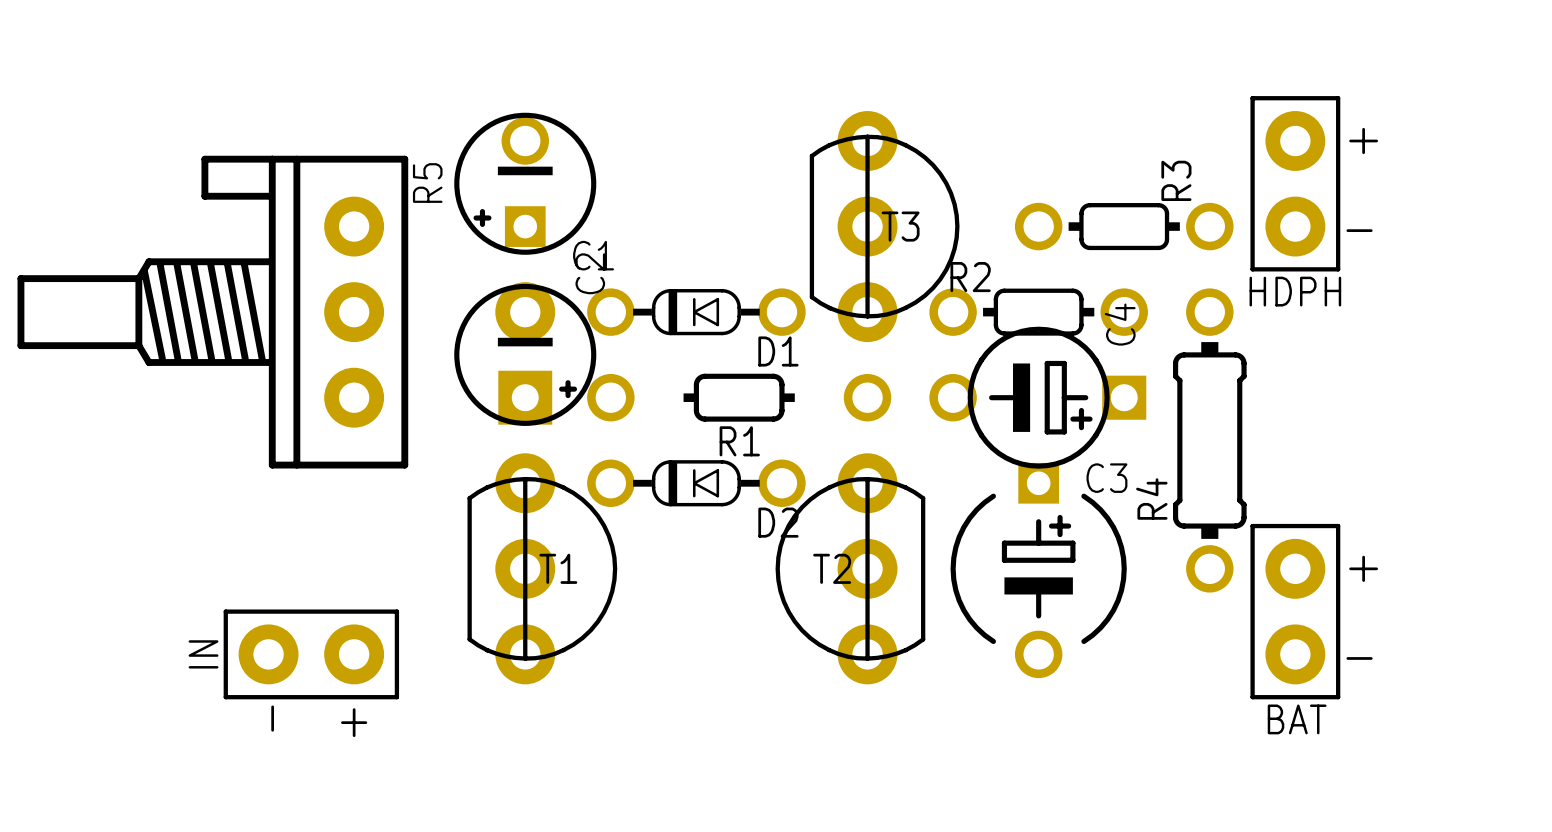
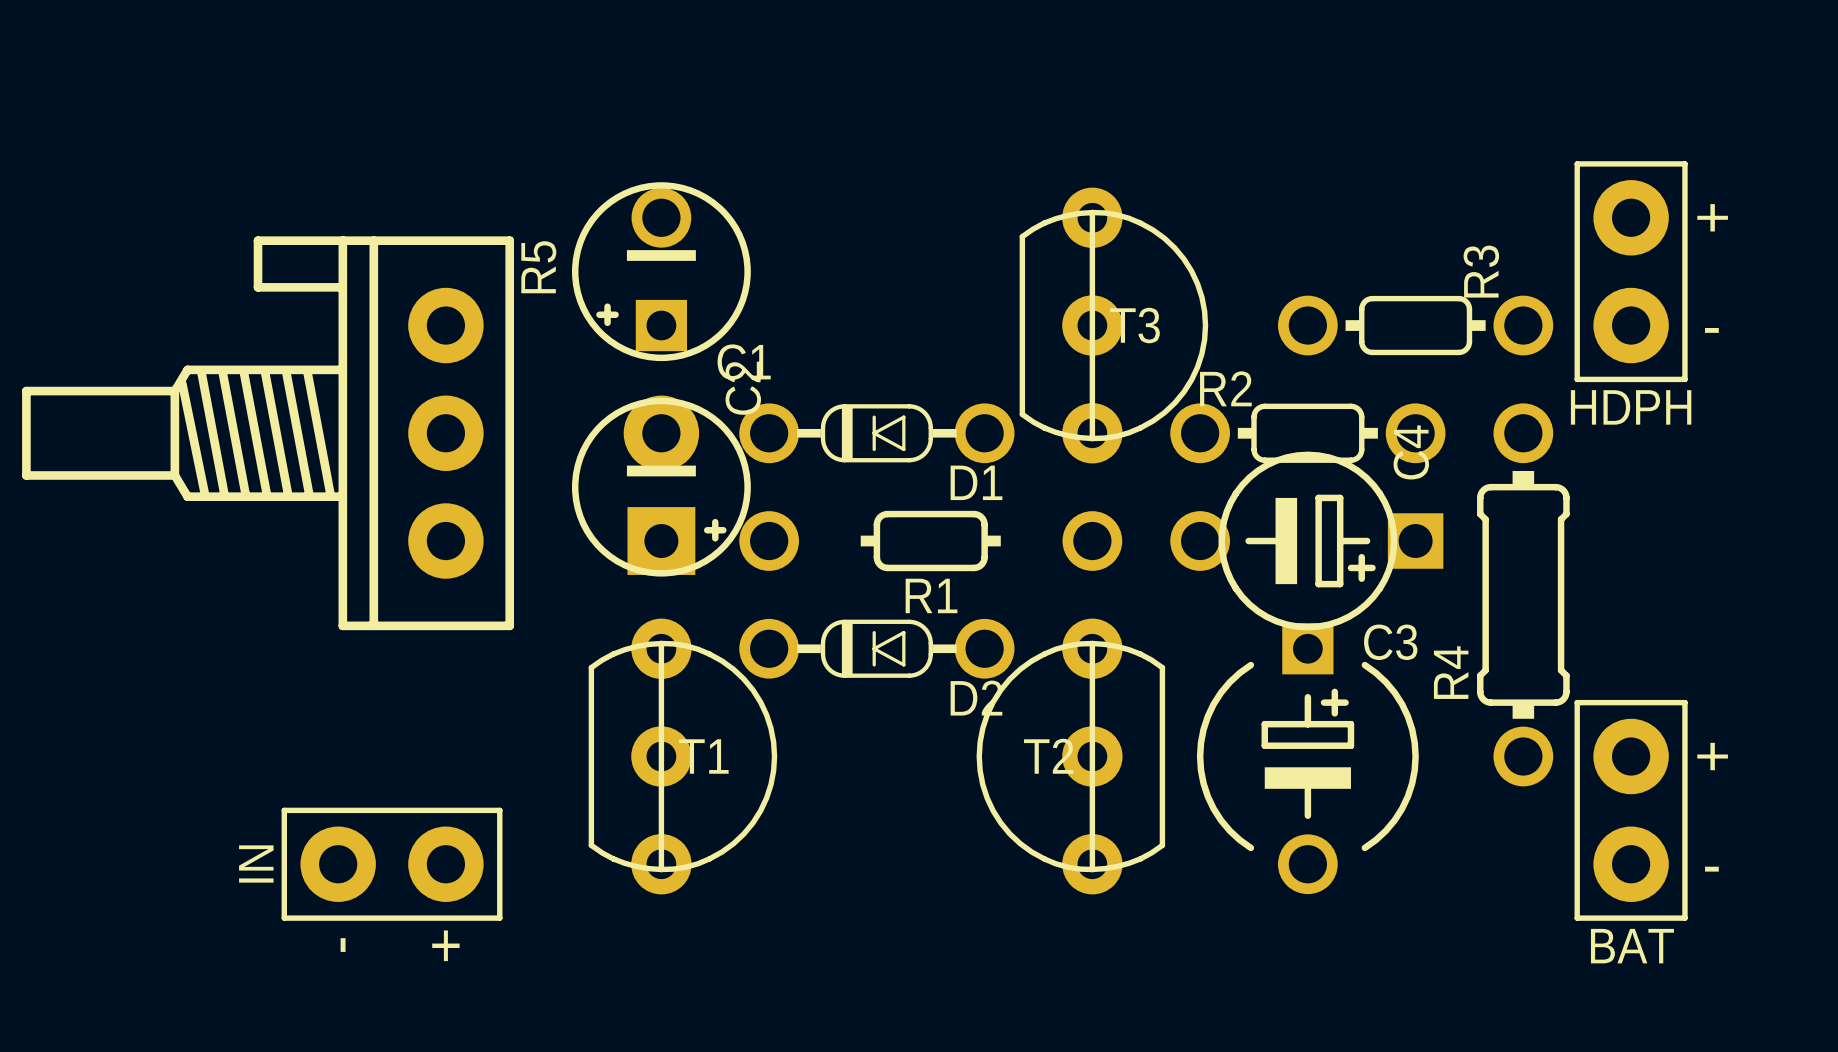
T3 footprint: [809, 111, 960, 343] -> [1019, 187, 1209, 464]
T1 footprint: [467, 453, 618, 685] -> [588, 618, 778, 895]
T2 footprint: [775, 453, 926, 685] -> [976, 618, 1166, 895]

